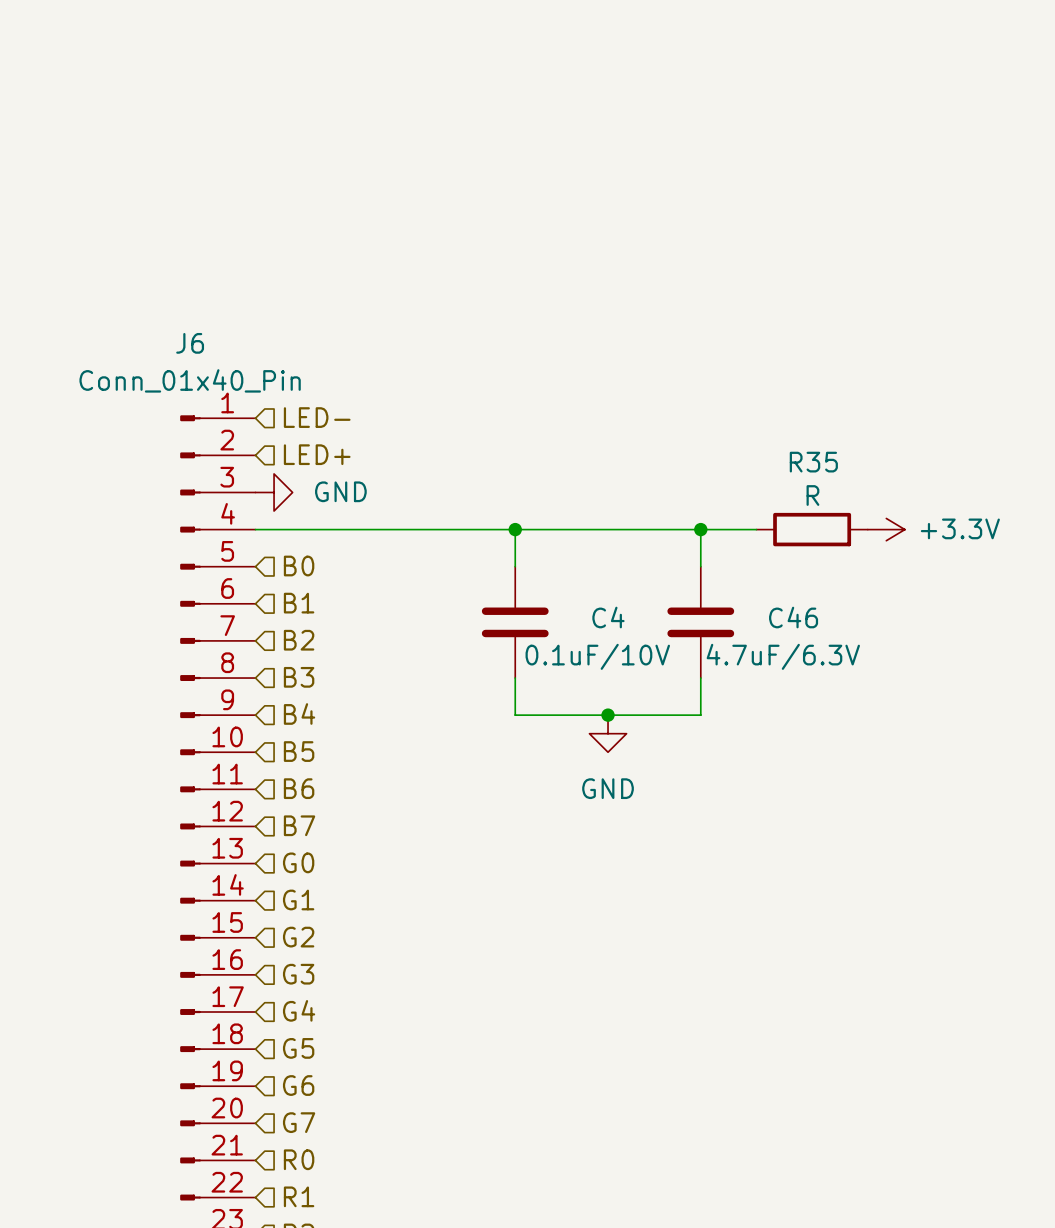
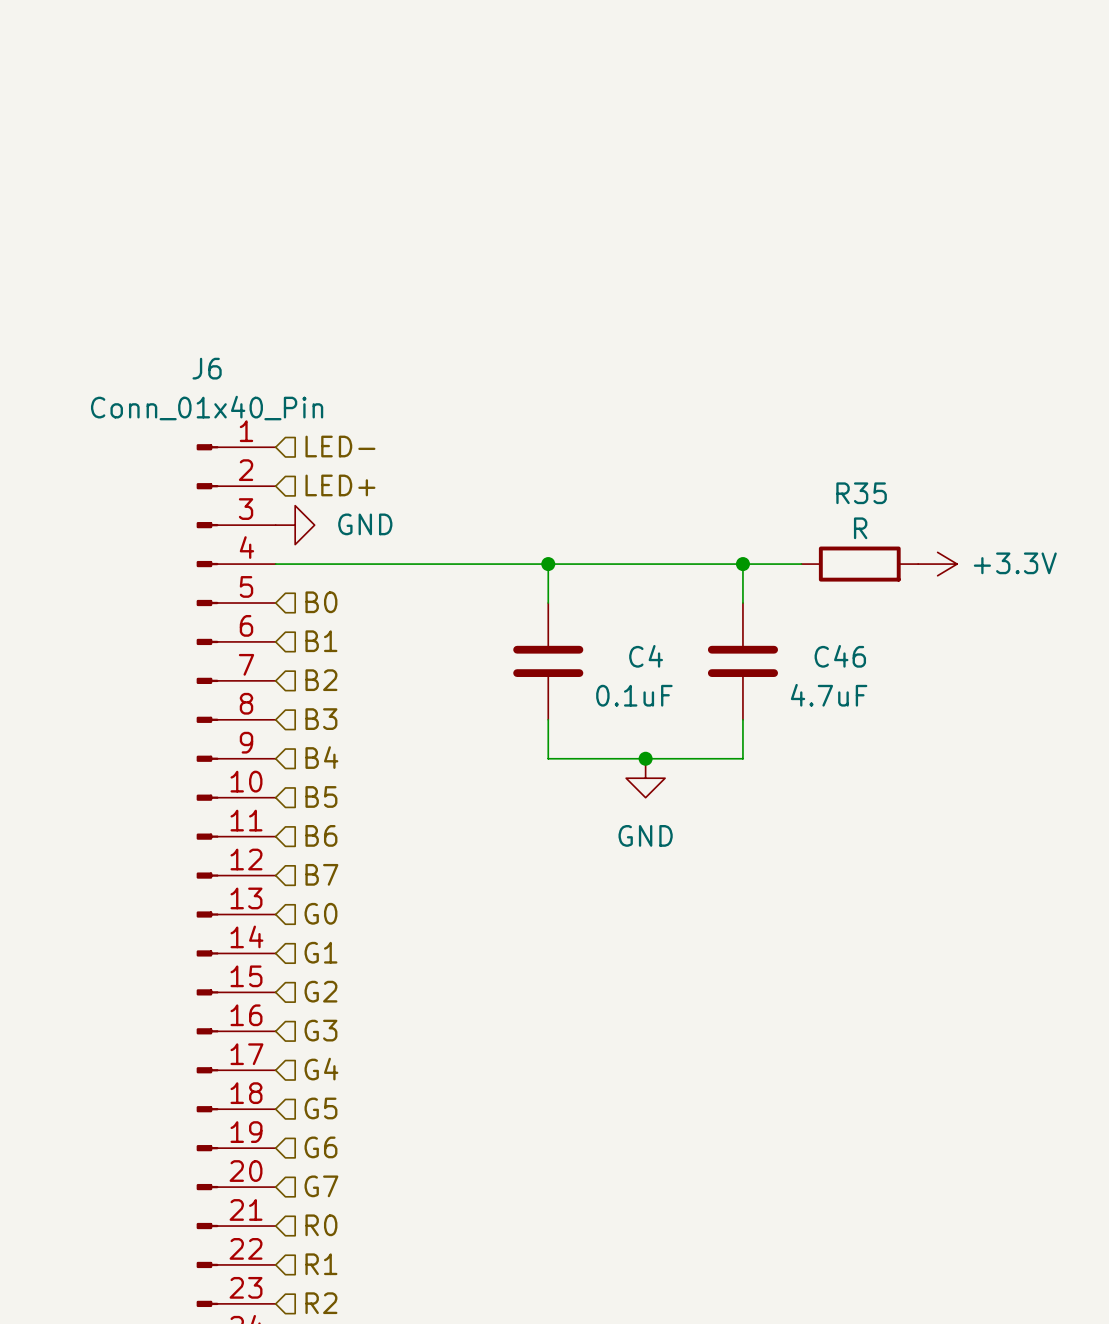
C4 value: 0.1uF/10V (597, 656) -> 0.1uF (634, 695)
C46 value: 4.7uF/6.3V (783, 656) -> 4.7uF (829, 695)

